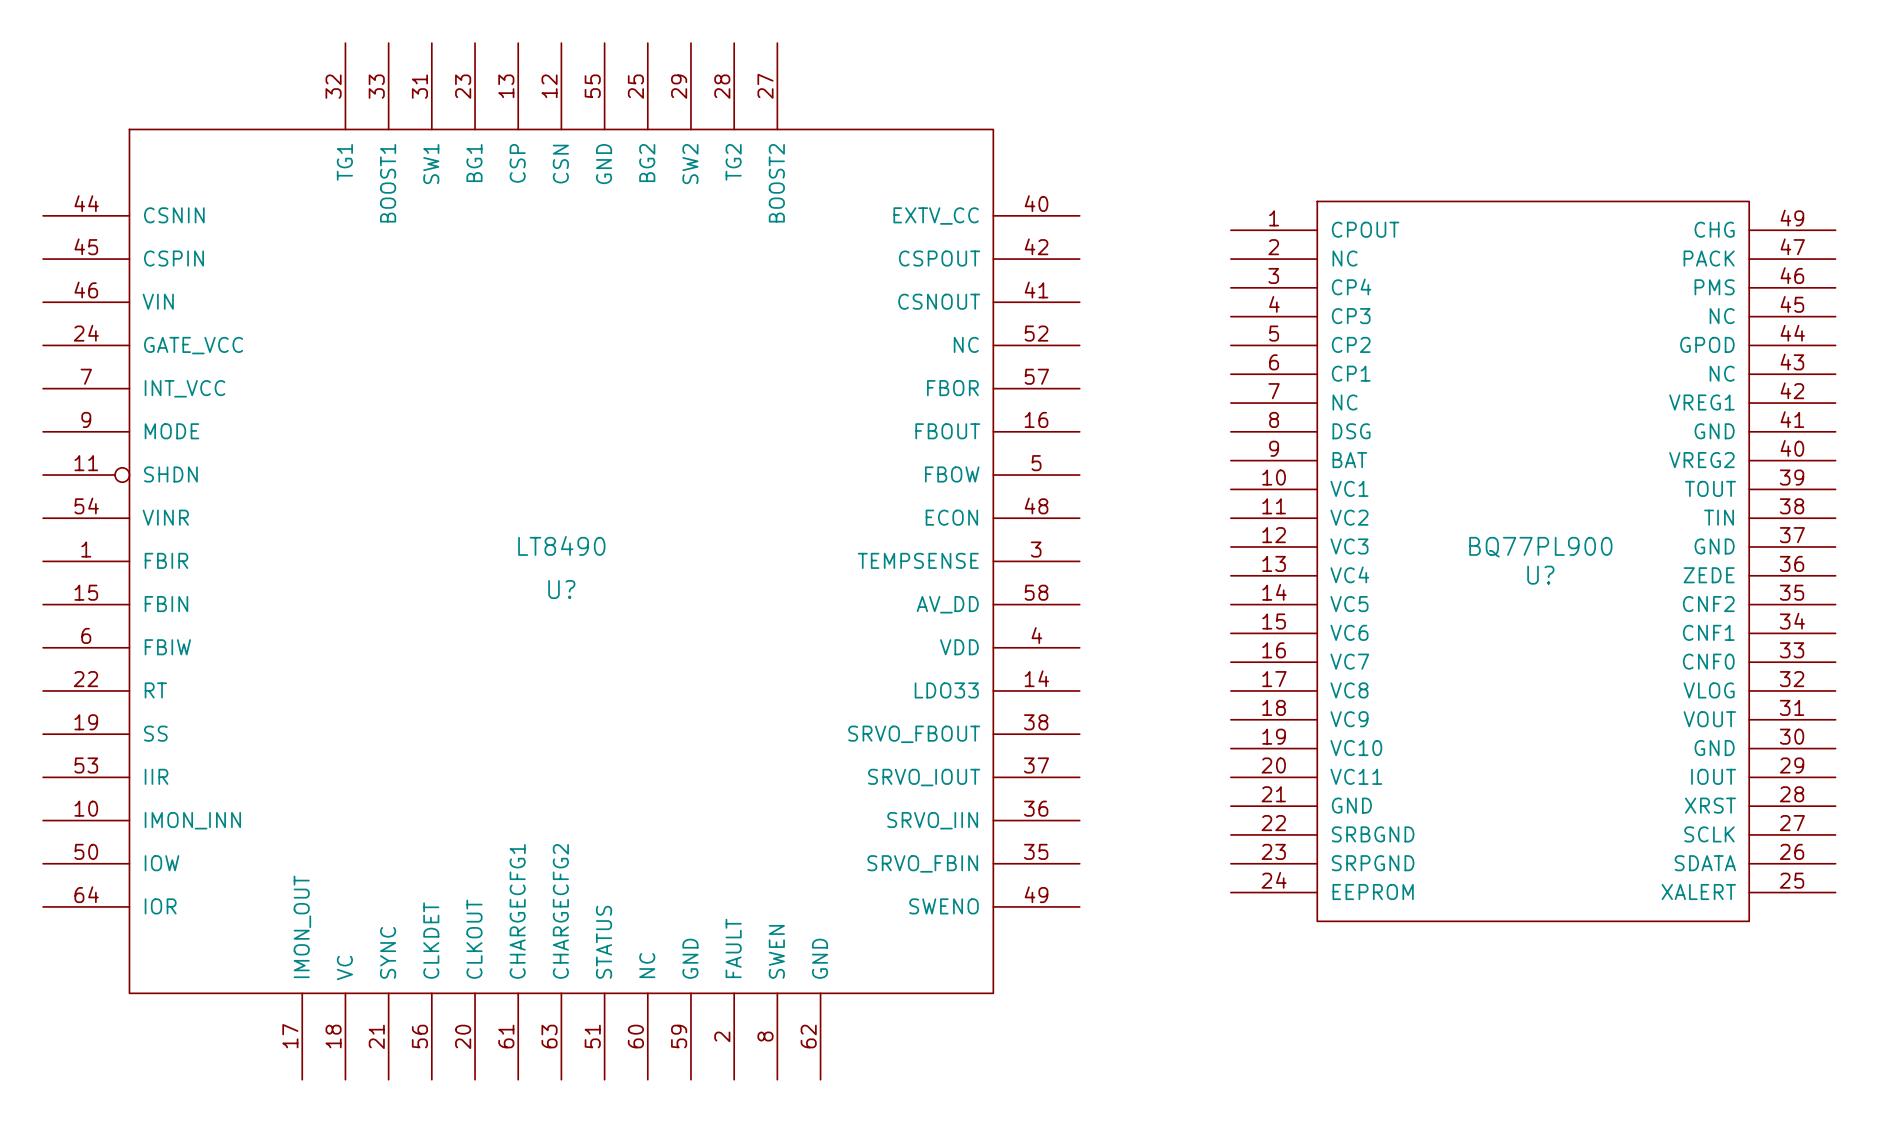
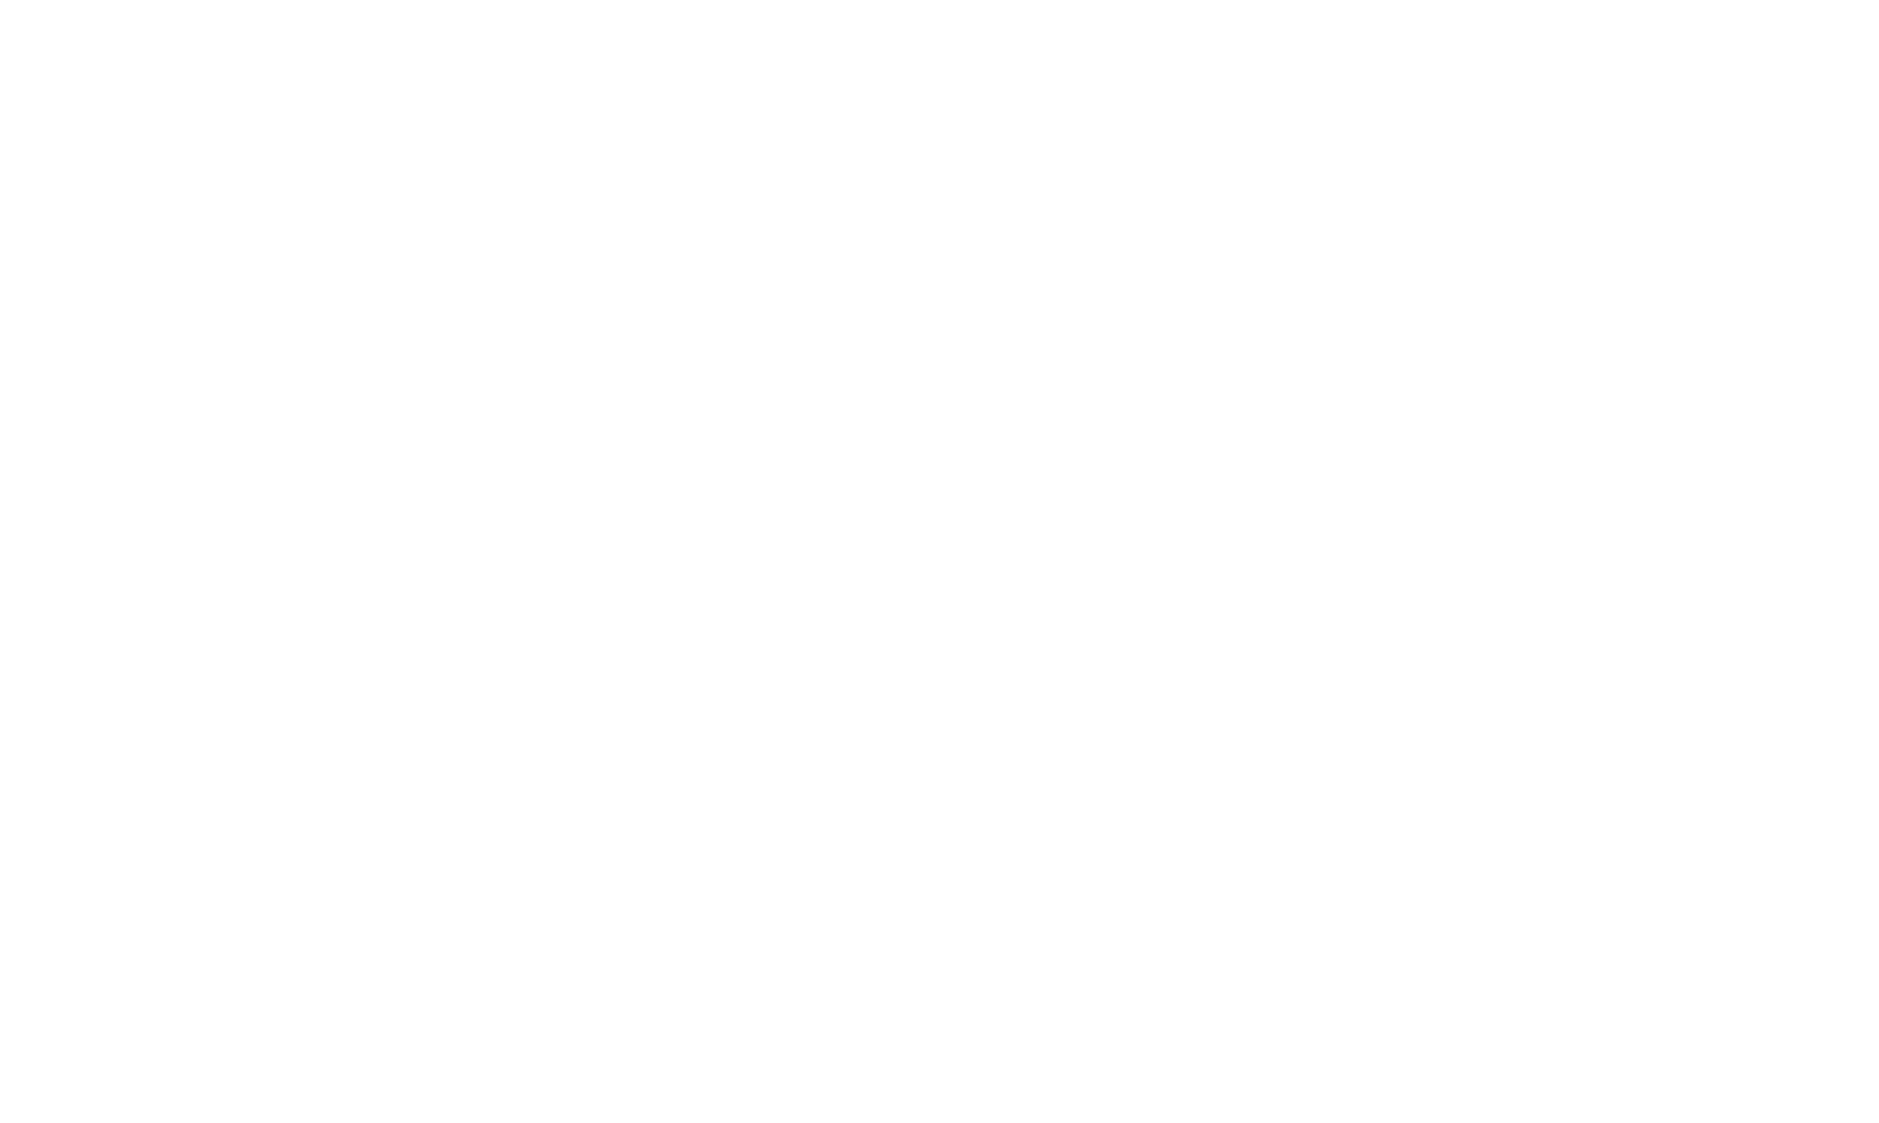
U?: LT8490 (561, 561) -> none
U?: BQ77PL900 (1533, 561) -> none

